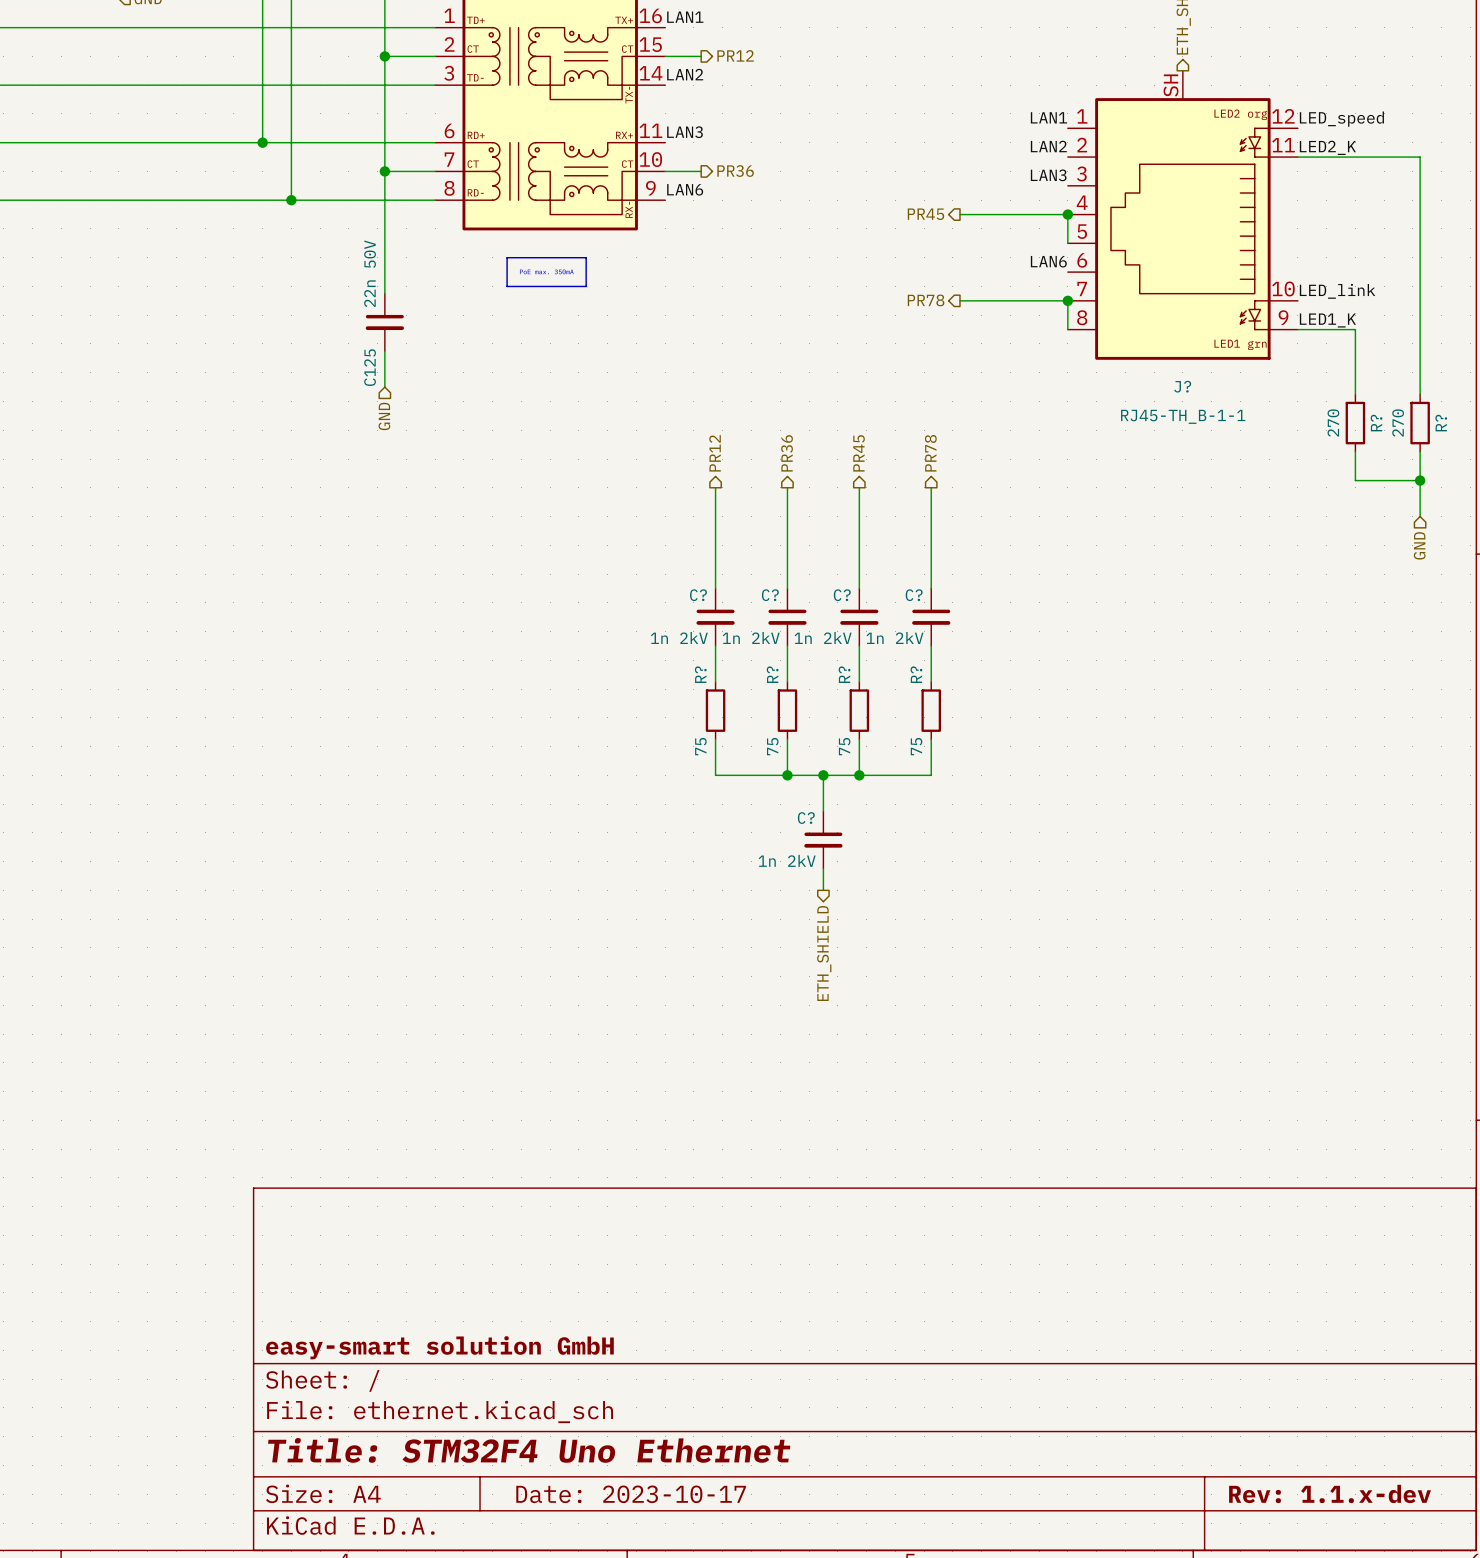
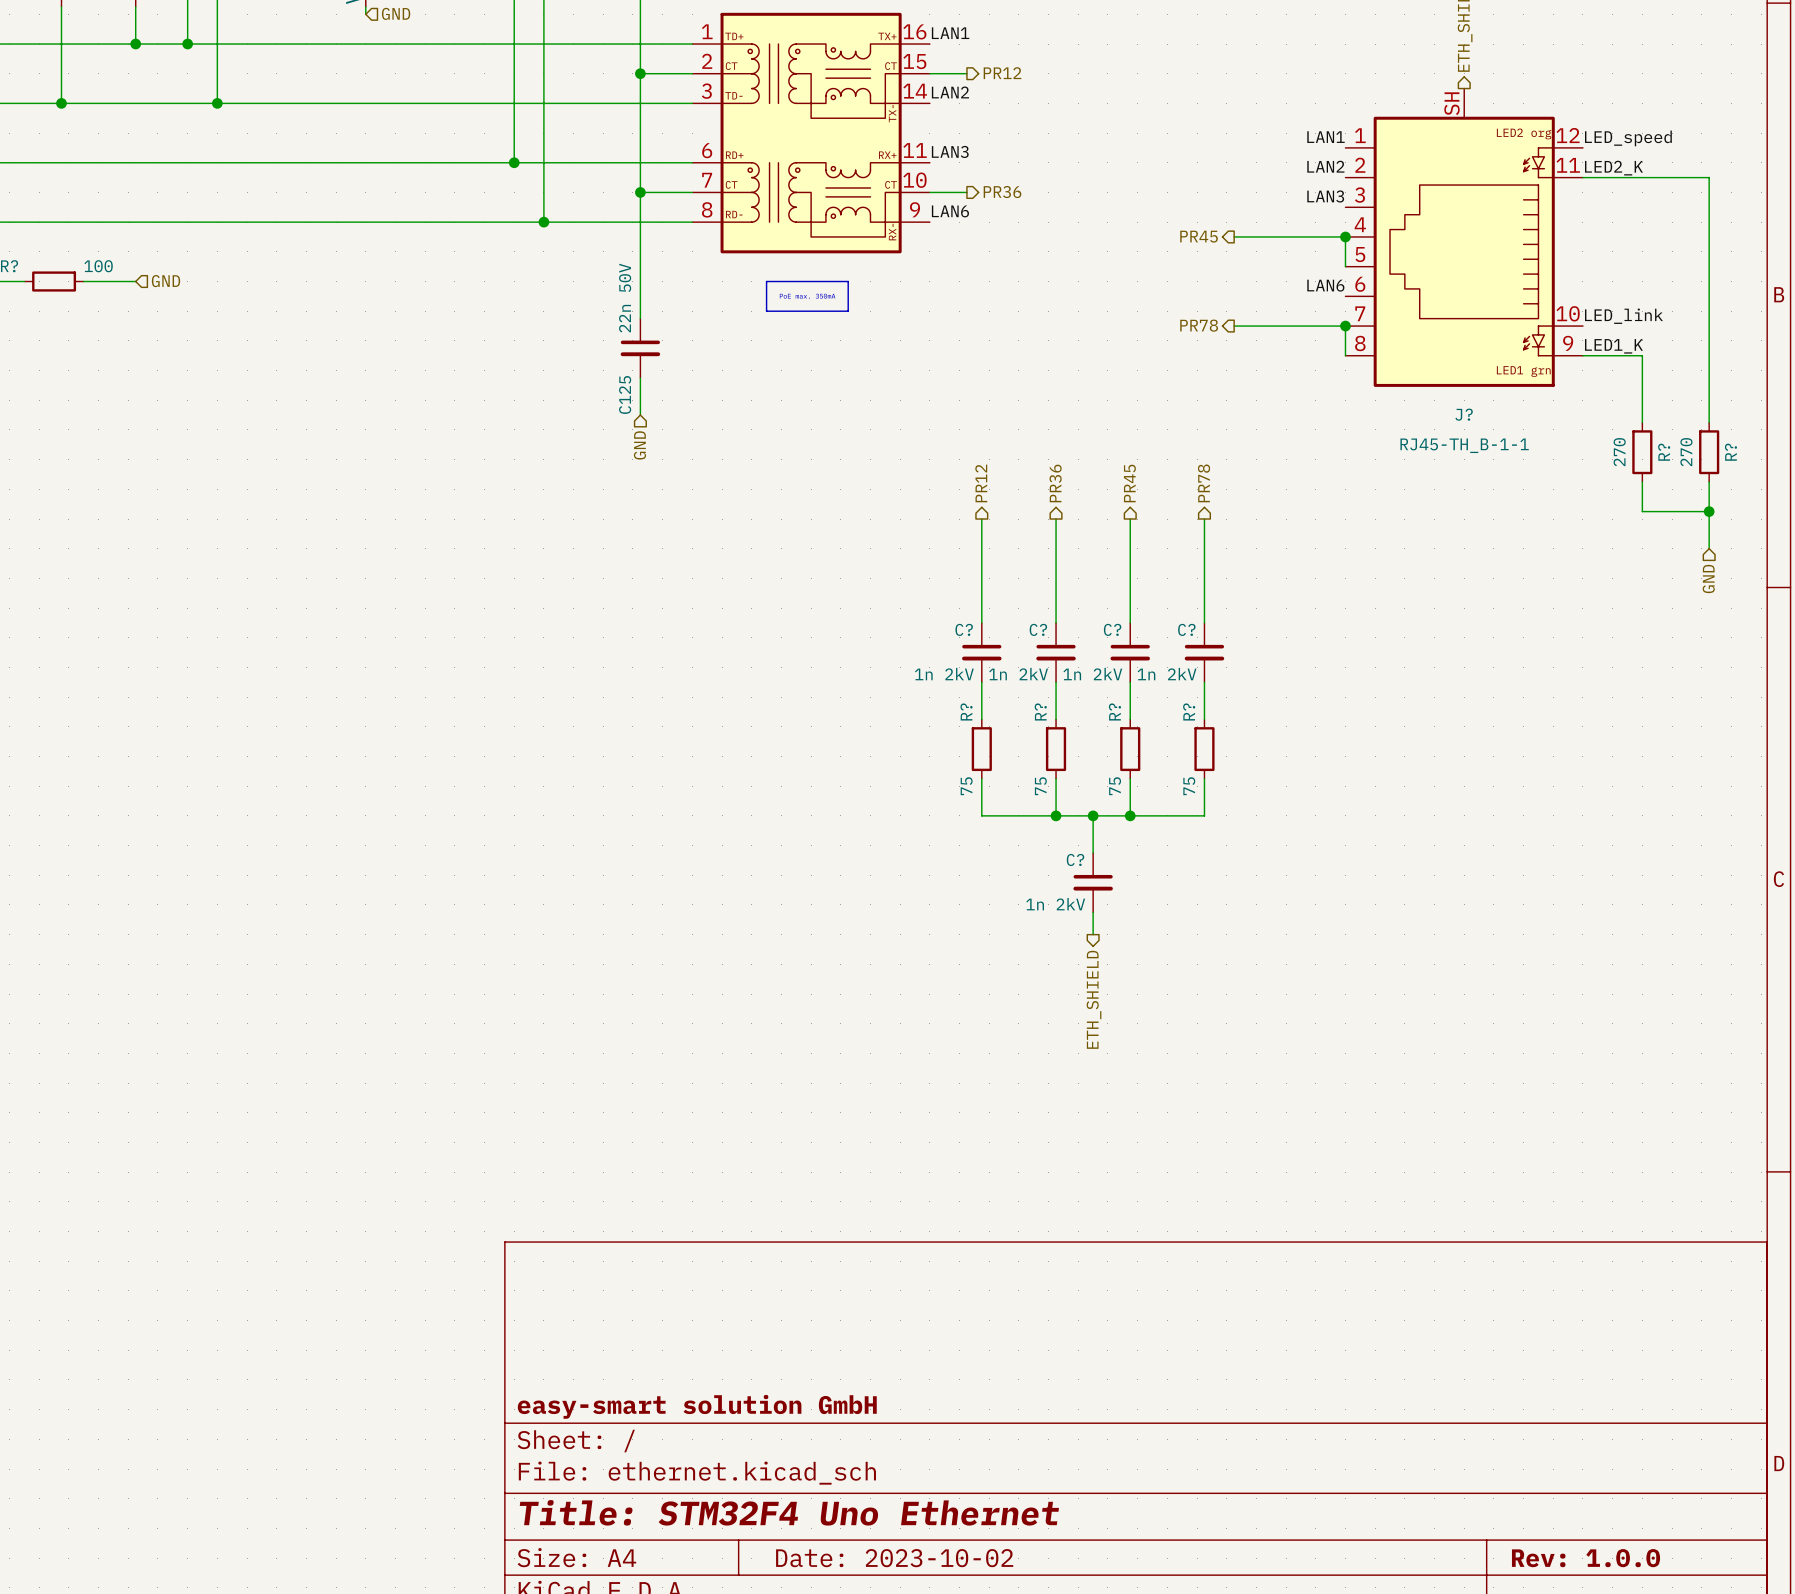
title block: Rev: 1.1.x-dev (1330, 1493) -> Rev: 1.0.0 (1586, 1558)
title block: Date: 2023-10-17 (631, 1494) -> Date: 2023-10-02 (894, 1558)

